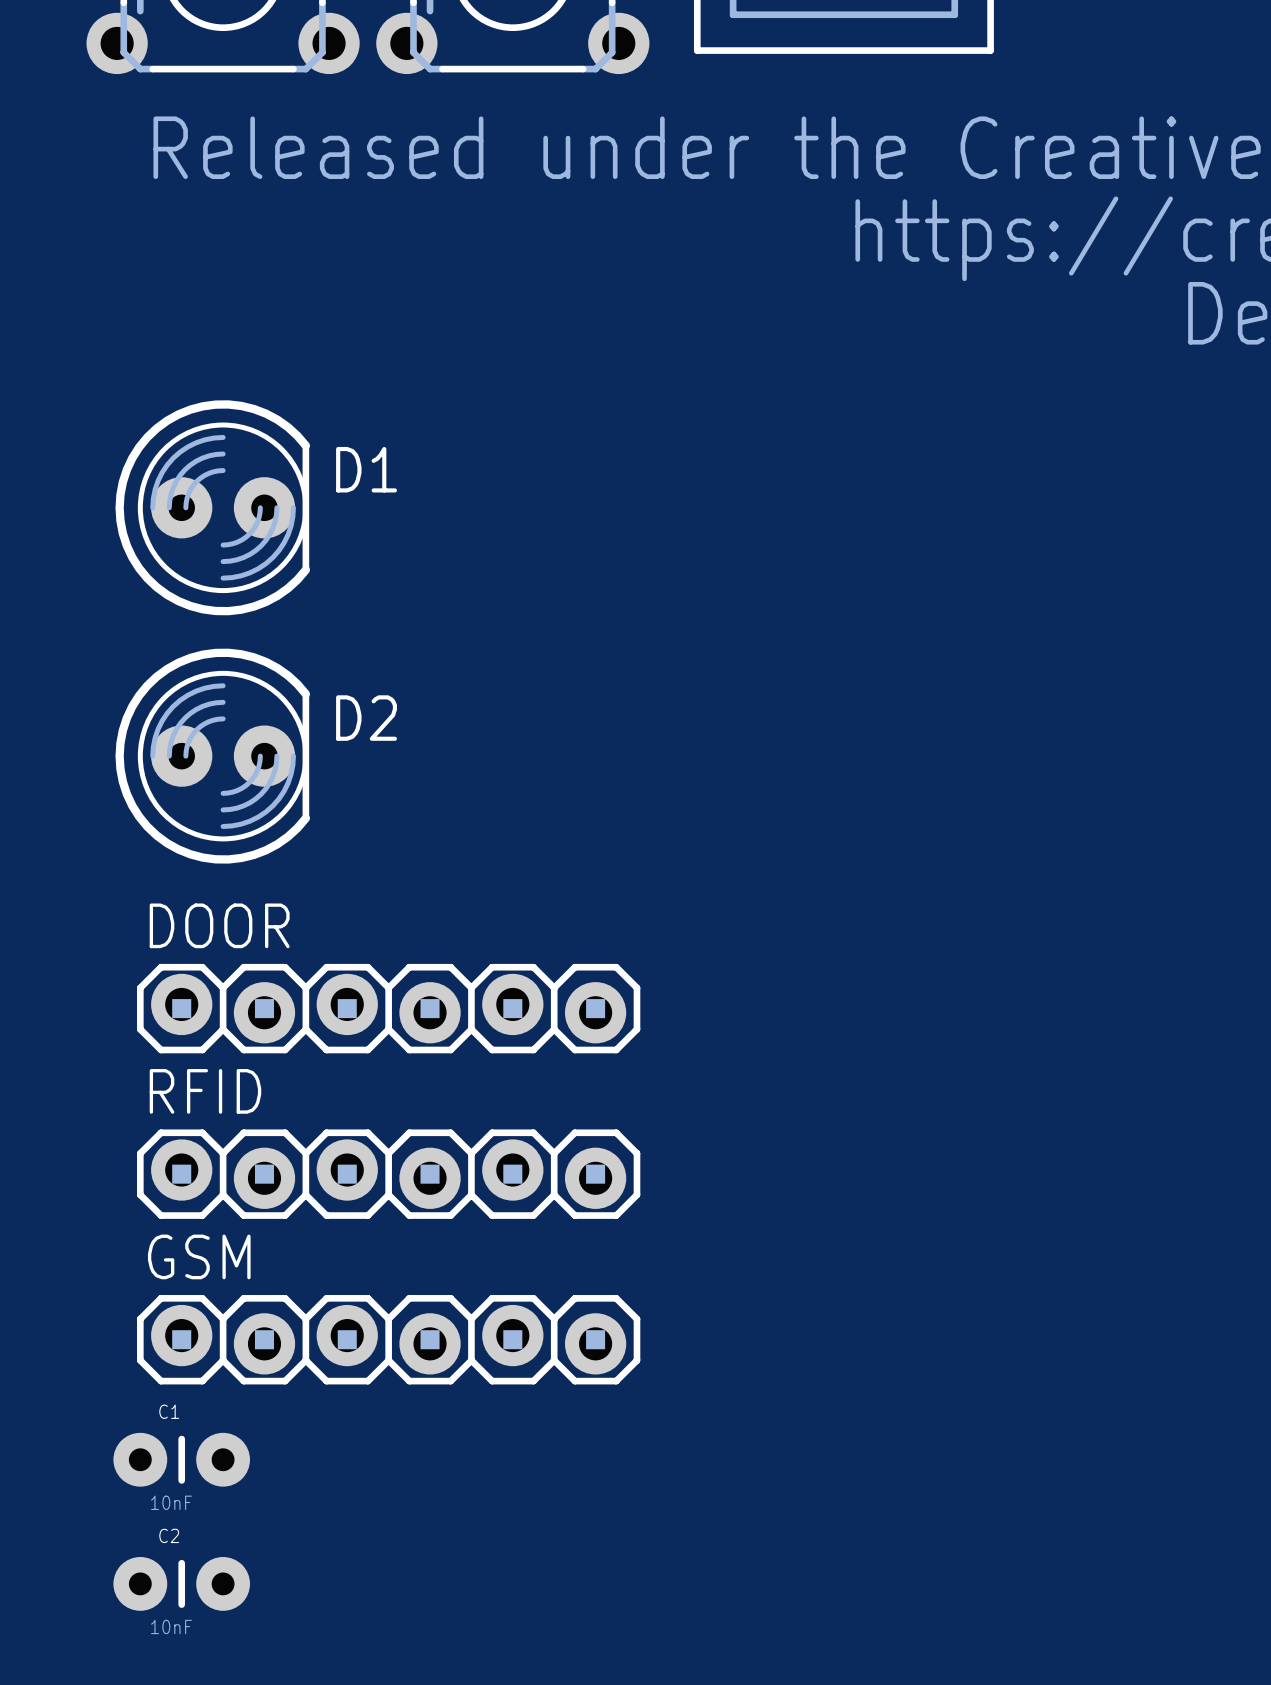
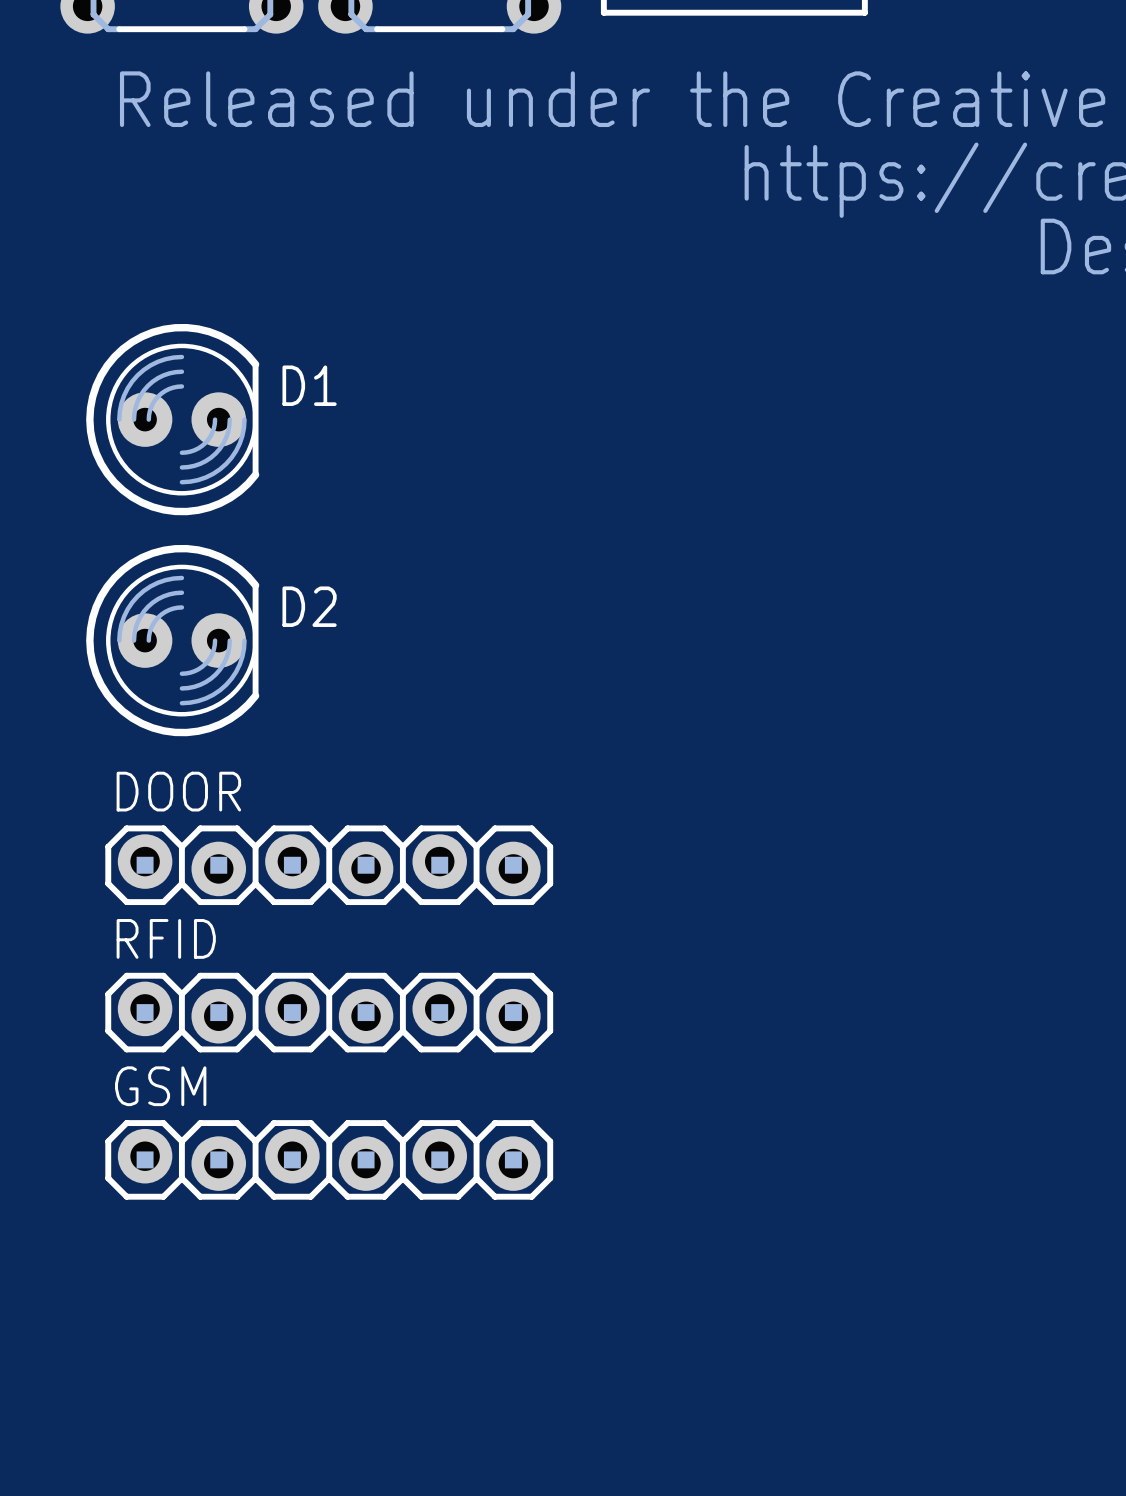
C1: 10nF (181, 1459) -> none
C2: 10nF (181, 1583) -> none

